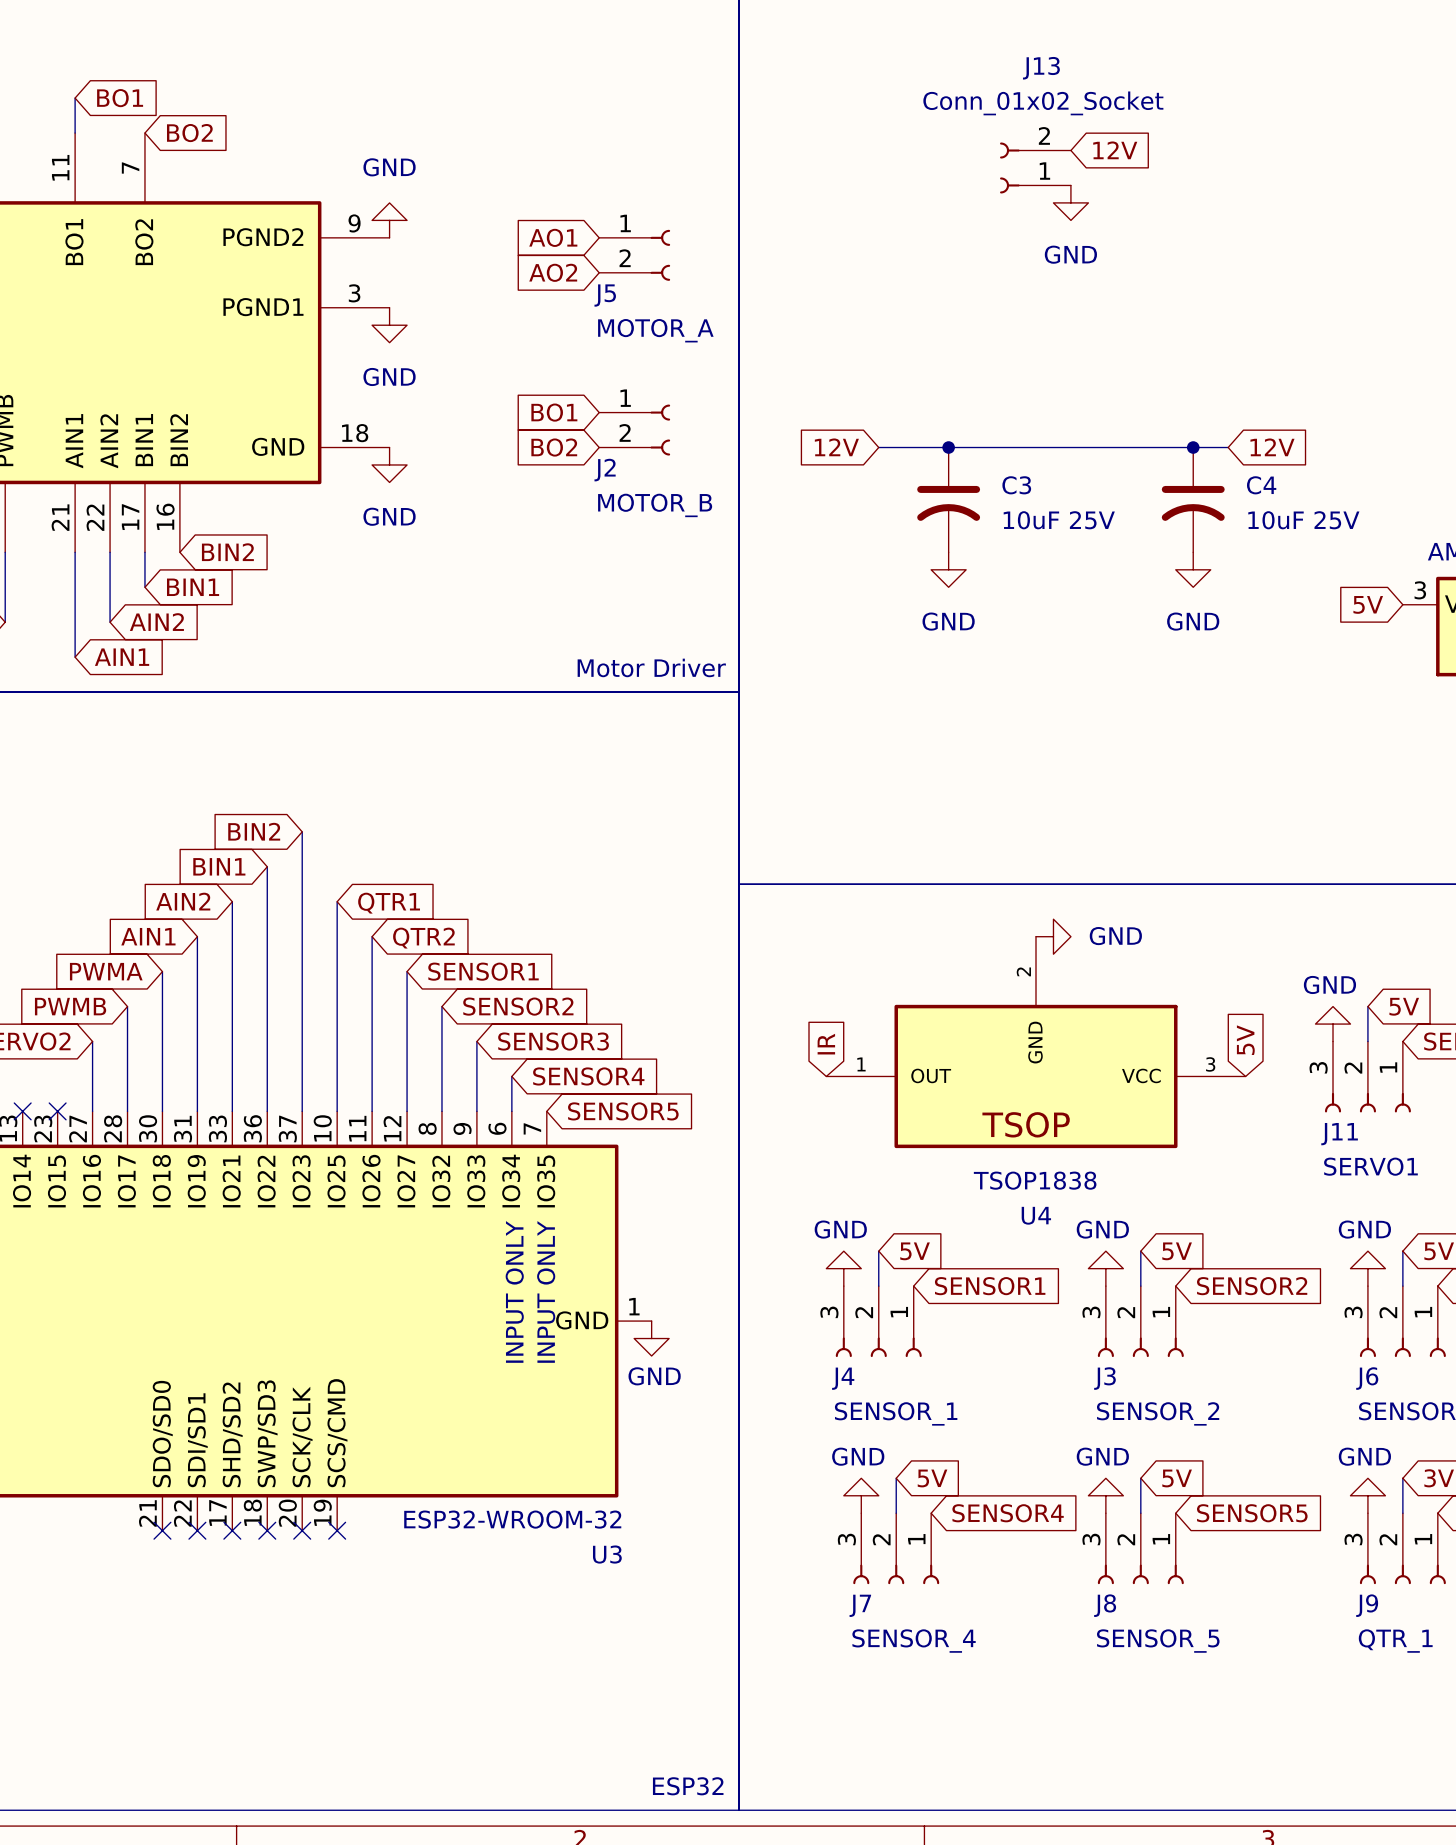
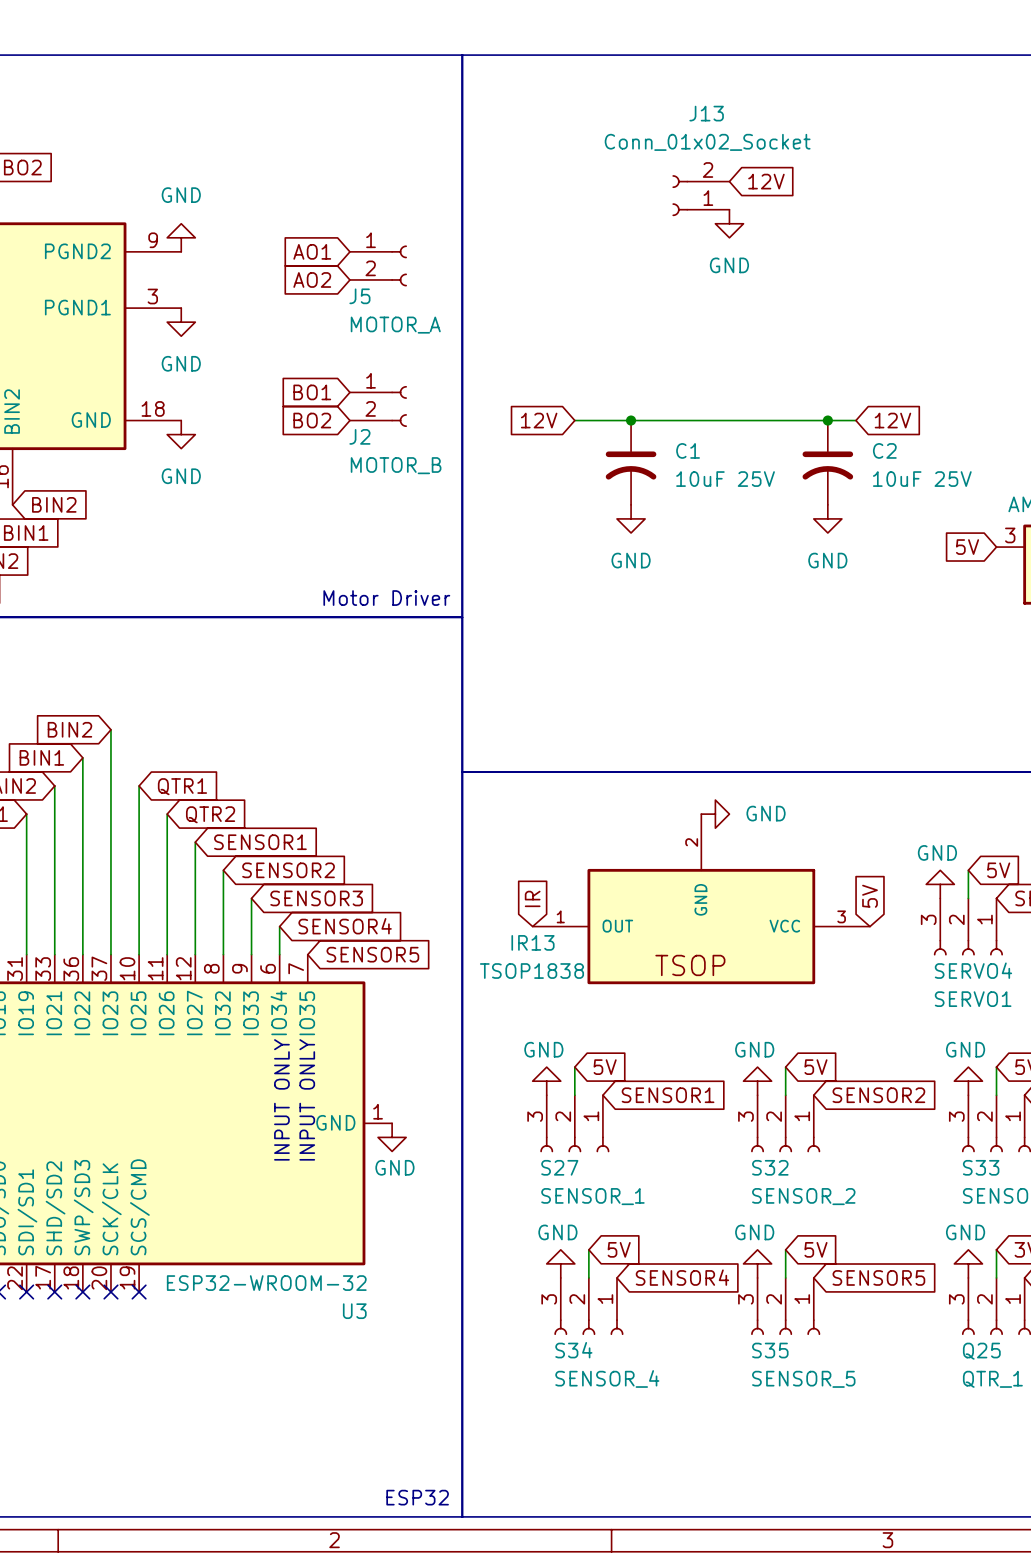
C3 name: C3 (1016, 485) -> C1 (688, 450)
C4 name: C4 (1261, 485) -> C2 (884, 450)
J11 name: J11 (1339, 1134) -> SERVO4 (973, 970)
U4 value position: TSOP1838 (1035, 1180) -> TSOP1838 (531, 971)
U4 name: U4 (1036, 1215) -> IR13 (532, 942)
J4 name: J4 (843, 1378) -> S27 (559, 1167)
J3 name: J3 (1104, 1378) -> S32 (770, 1167)
J6 name: J6 (1367, 1378) -> S33 (981, 1167)
J7 name: J7 (860, 1605) -> S34 (573, 1350)
J8 name: J8 (1105, 1605) -> S35 (770, 1350)
J9 name: J9 (1367, 1605) -> Q25 (981, 1351)

